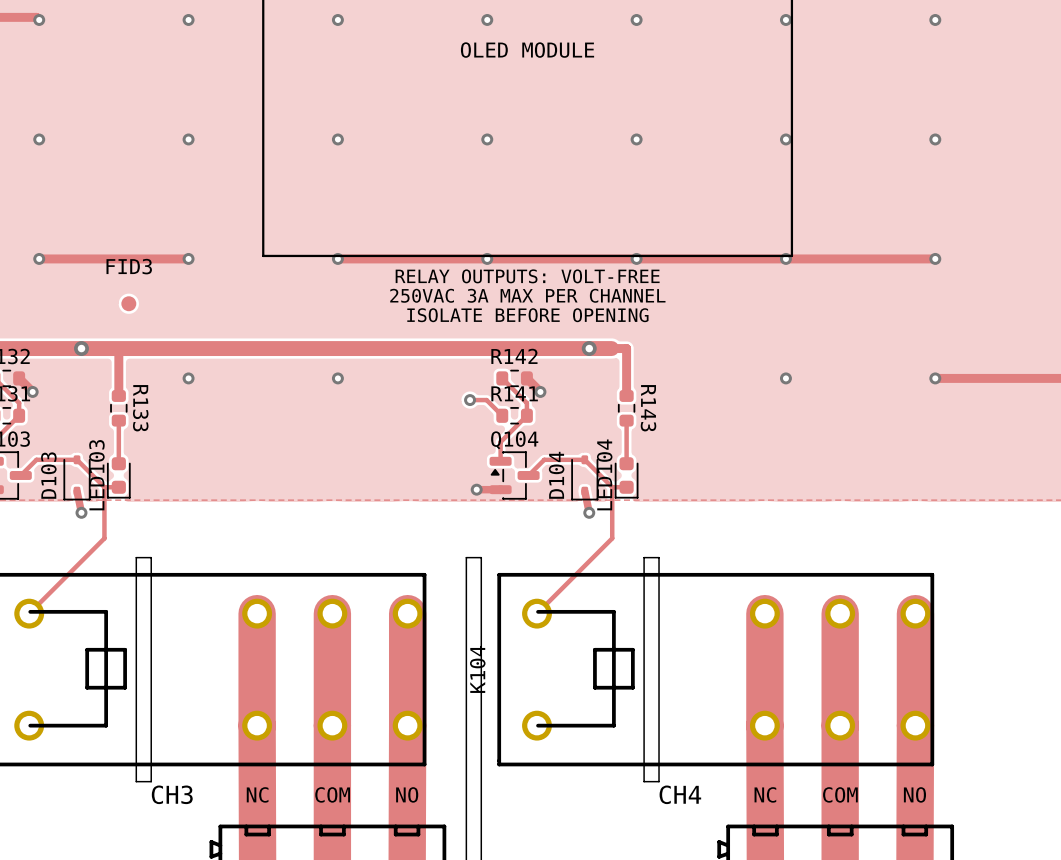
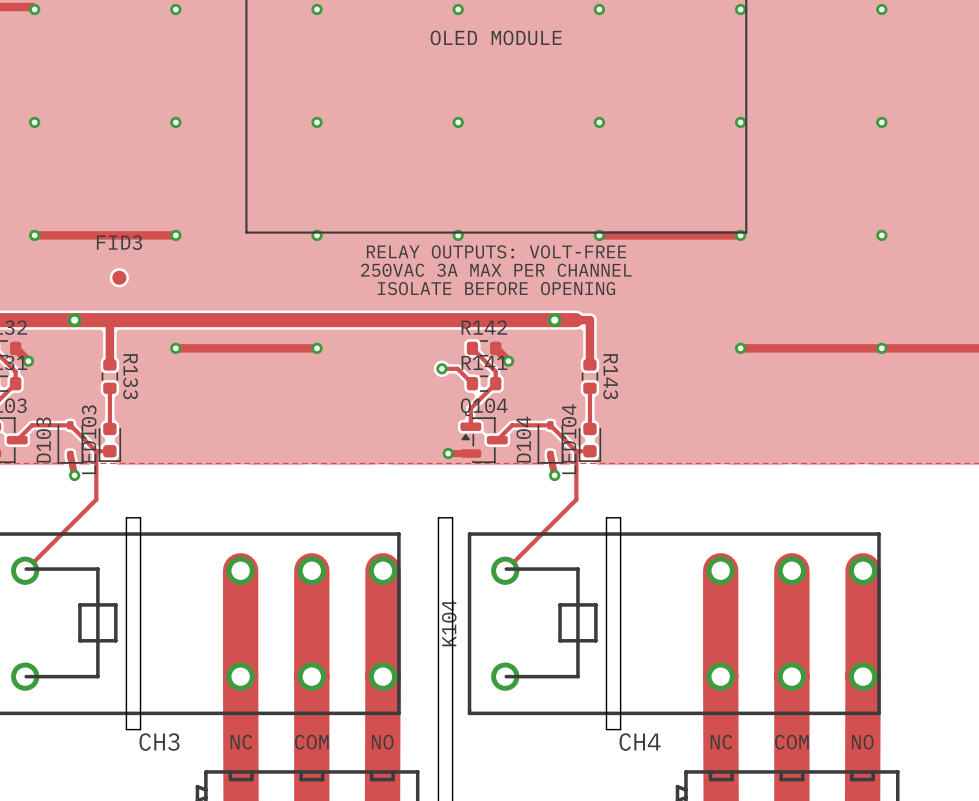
track: (337, 258) (636, 258) -> none
track: (785, 258) (935, 258) -> (740, 348) (881, 348)
track: none -> (175, 348) (317, 348)

